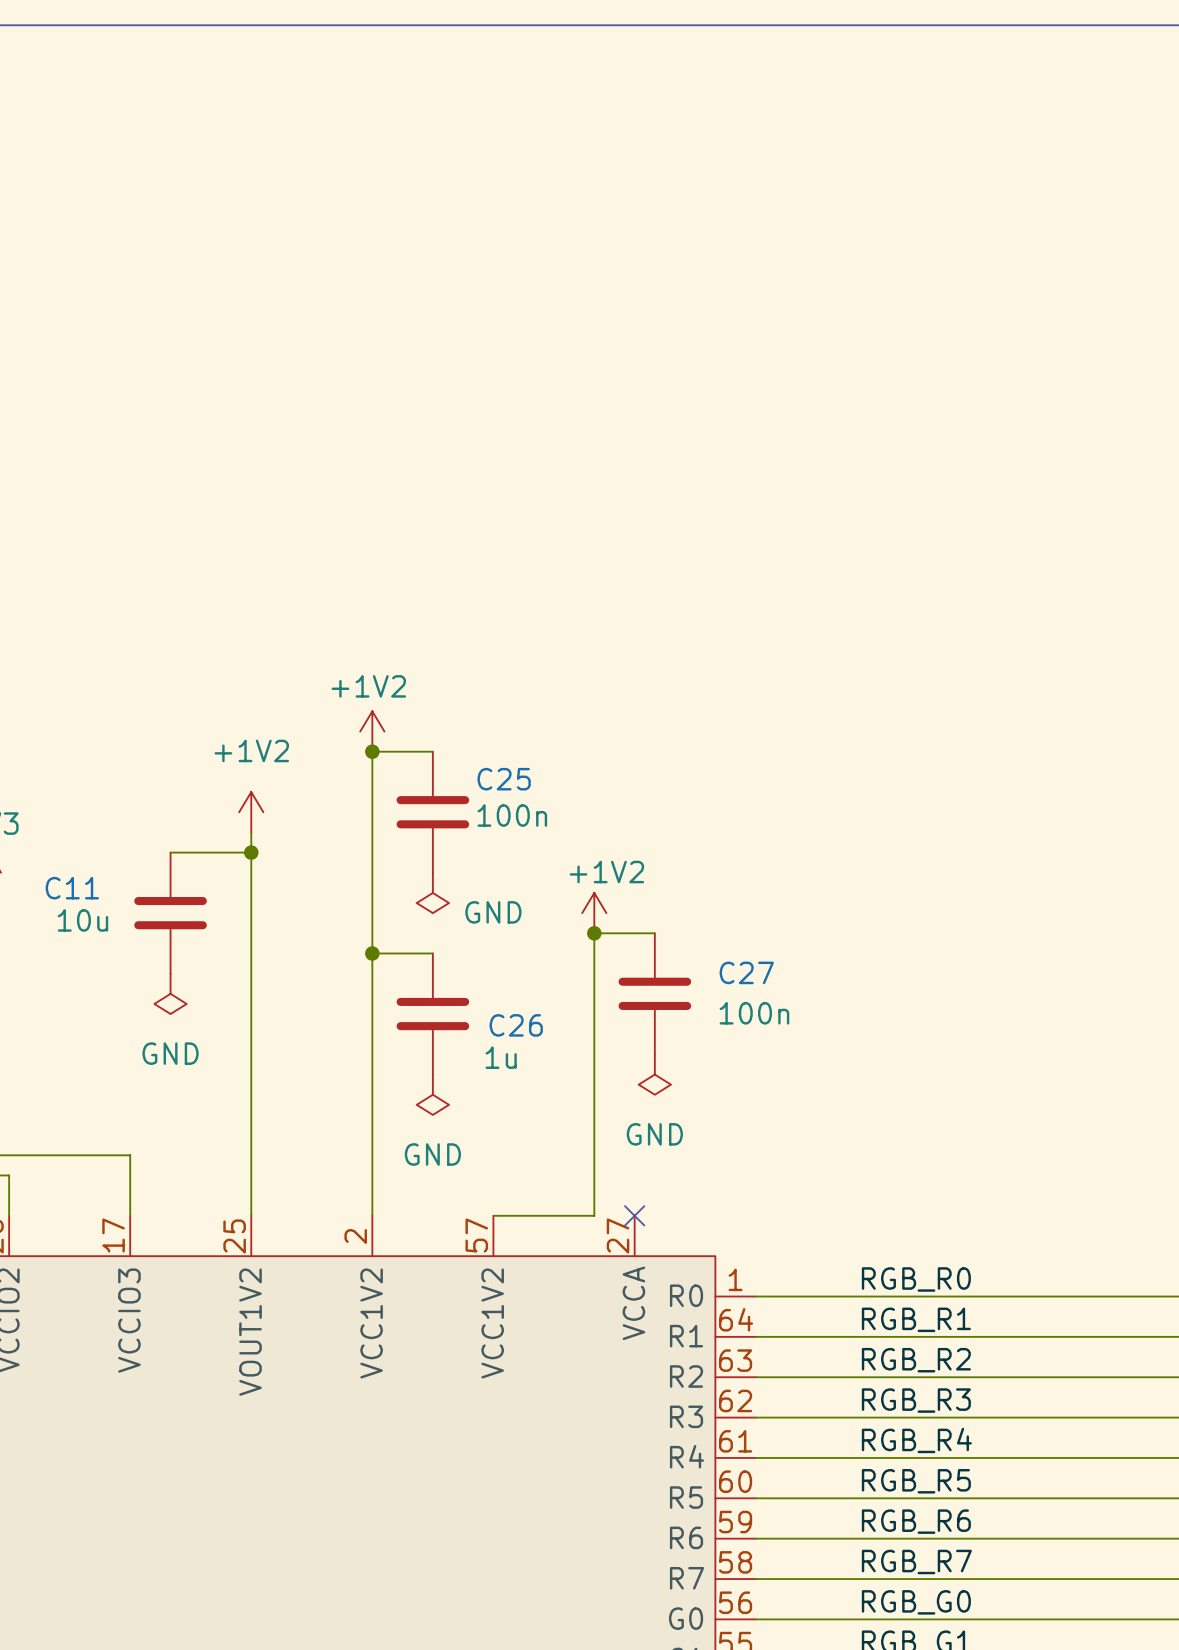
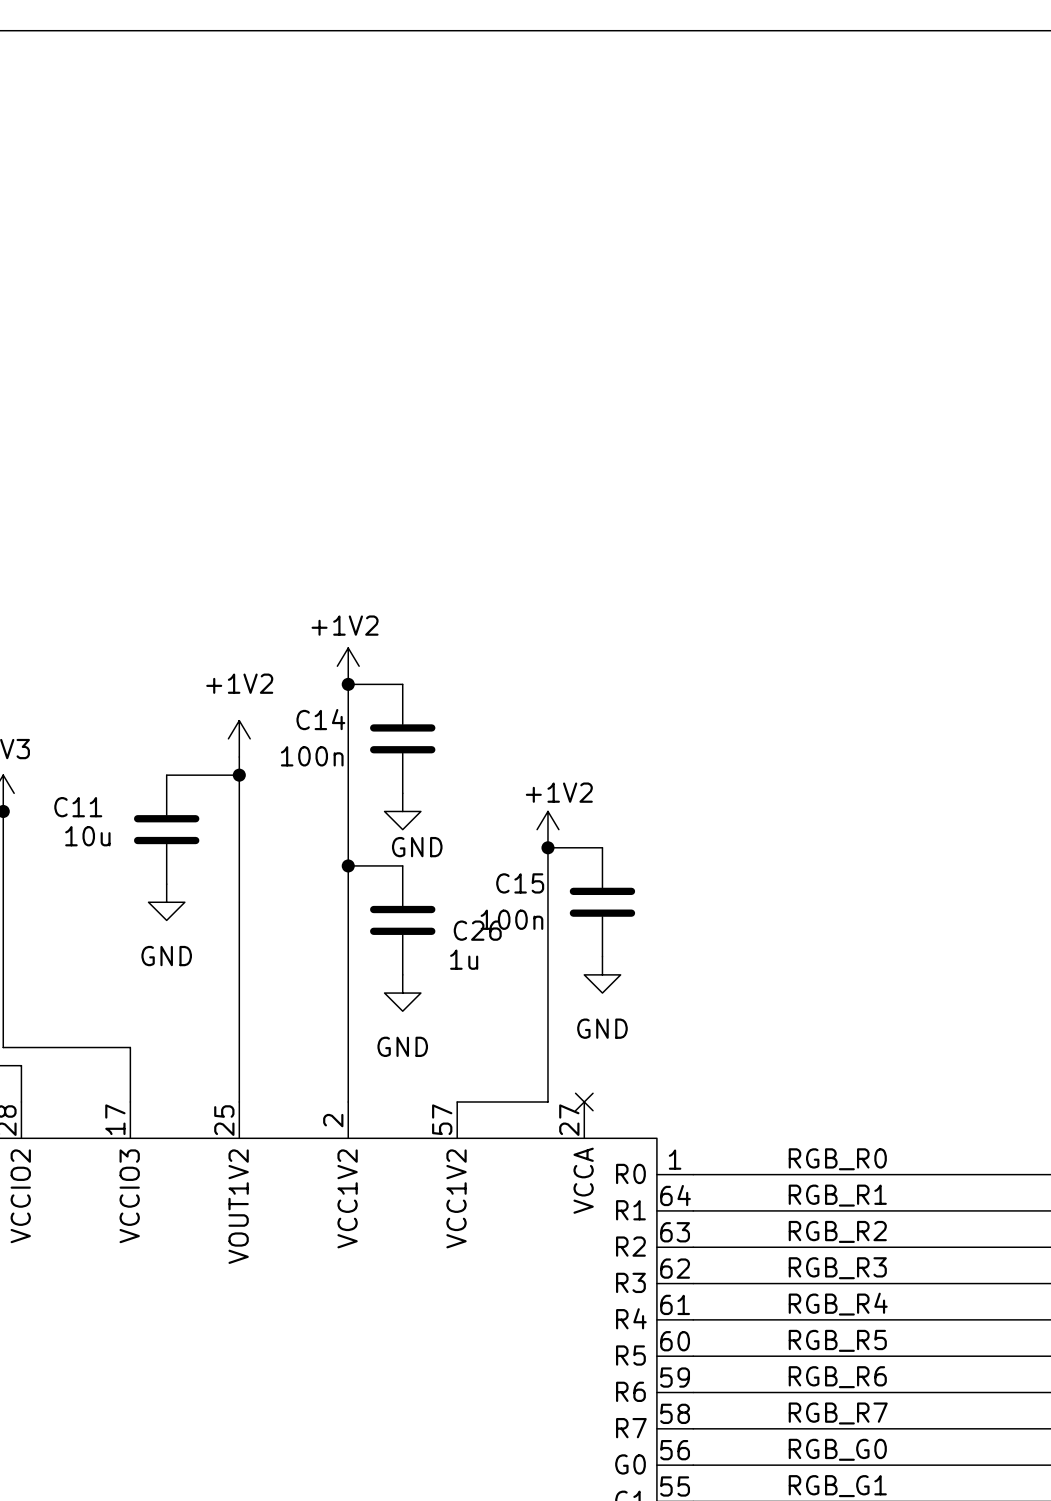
C25 name: C25 (504, 779) -> C14 (320, 719)
C25 value position: 100n (512, 815) -> 100n (312, 756)
power symbol shape: [416, 872, 450, 914] -> [384, 793, 421, 830]
power symbol text position: GND (493, 912) -> GND (417, 847)
C27 name: C27 (746, 972) -> C15 (520, 883)
power symbol shape: [154, 973, 187, 1015] -> [148, 884, 185, 921]
C27 value position: 100n (754, 1013) -> 100n (511, 919)
power symbol shape: [638, 1054, 671, 1095] -> [584, 956, 621, 994]
power symbol shape: [416, 1074, 450, 1115] -> [384, 974, 421, 1012]

